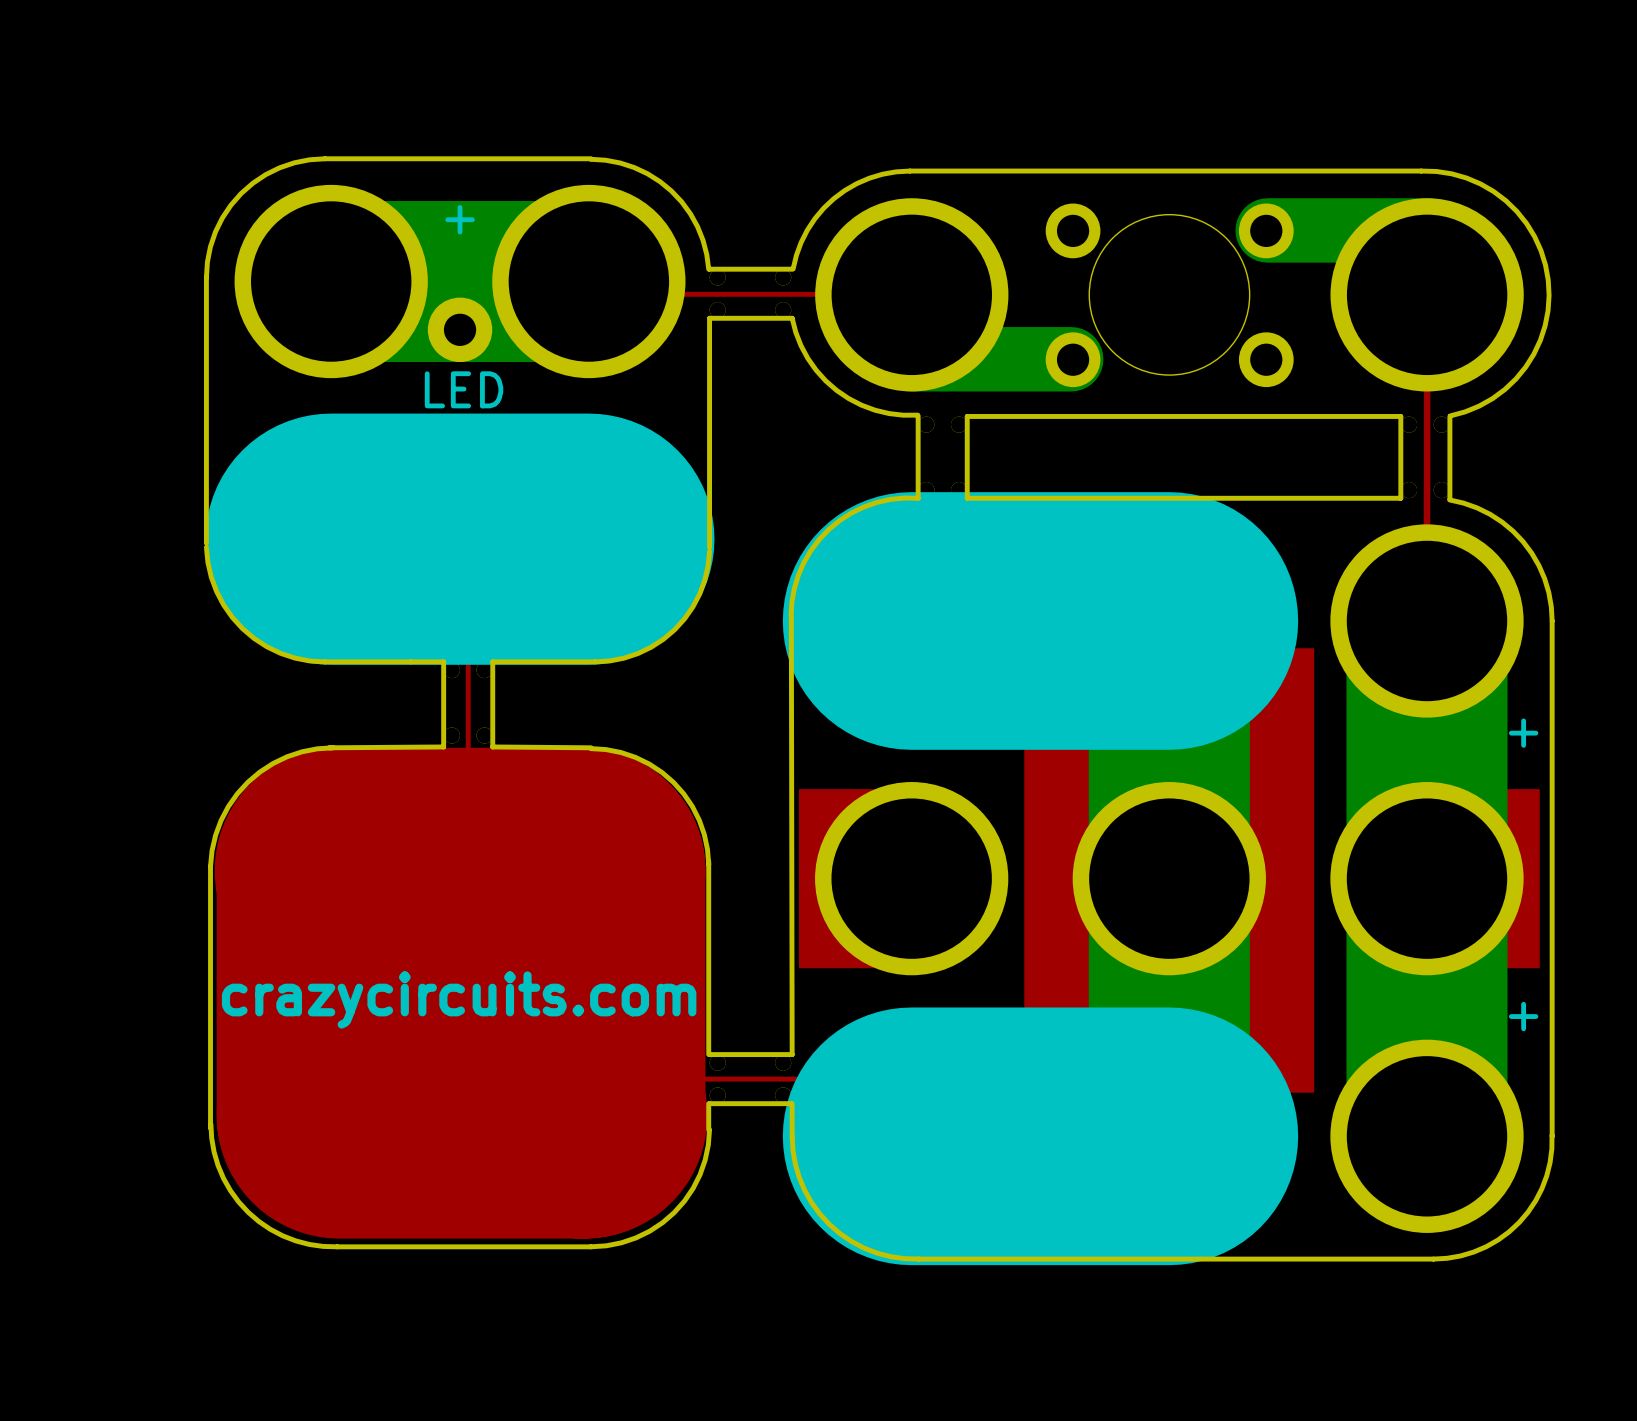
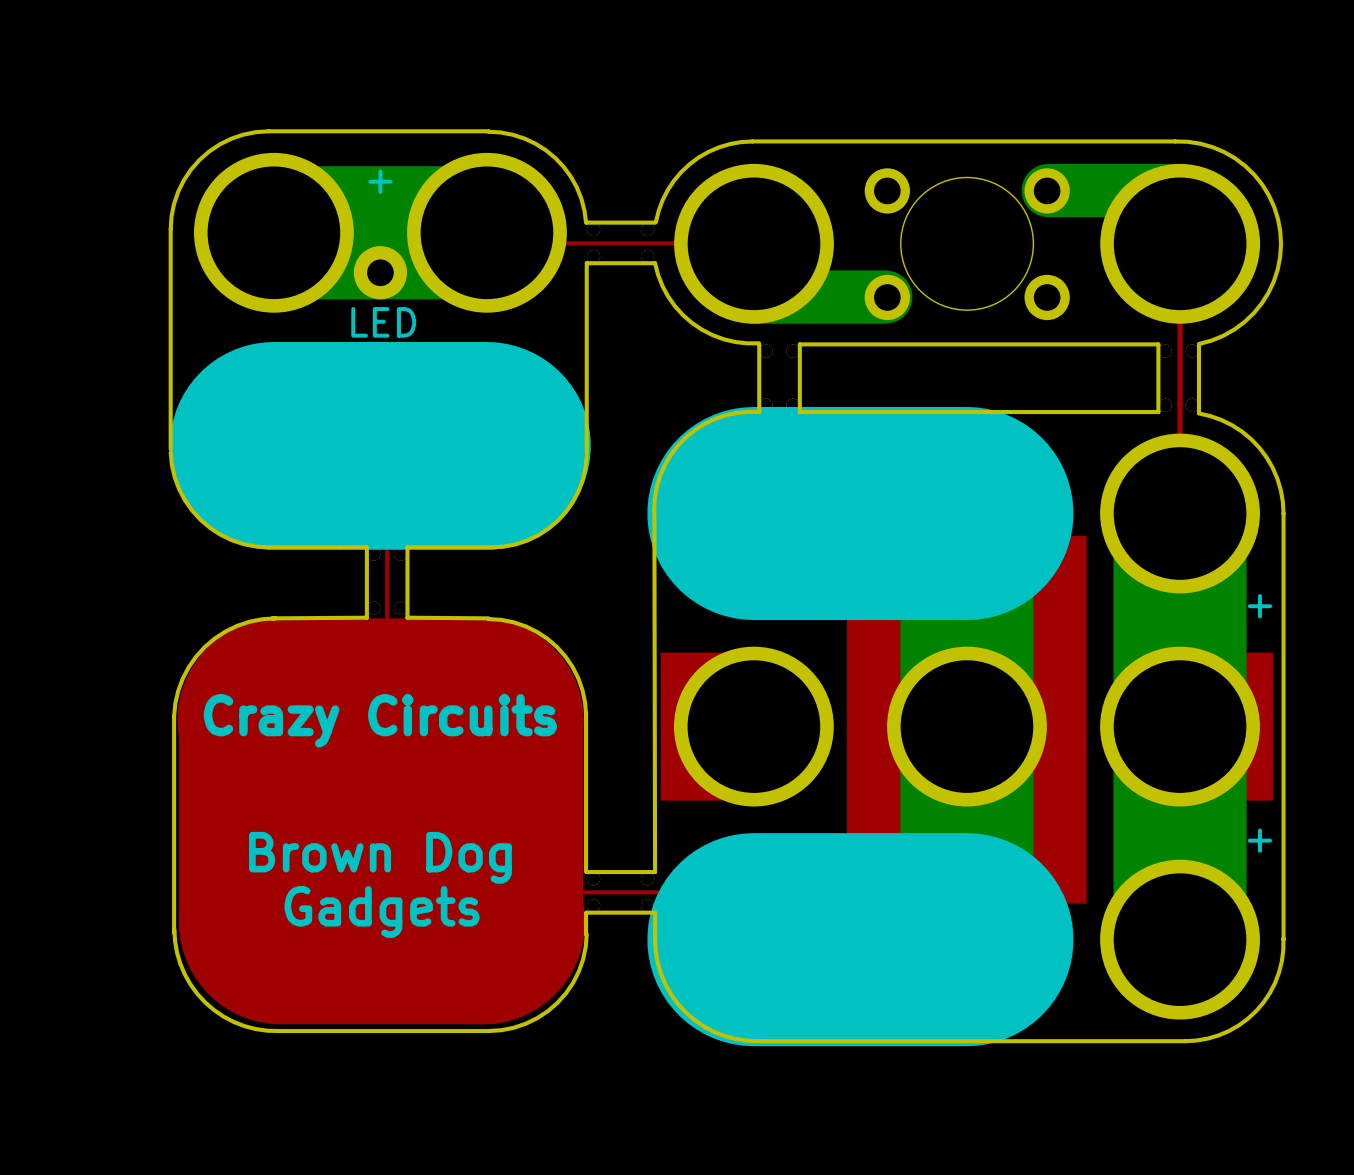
part text: none -> Crazy Circuits (380, 720)
part text: crazycircuits.com (459, 1000) -> none
part text: none -> Brown Dog (380, 857)
part text: none -> Gadgets (382, 911)

